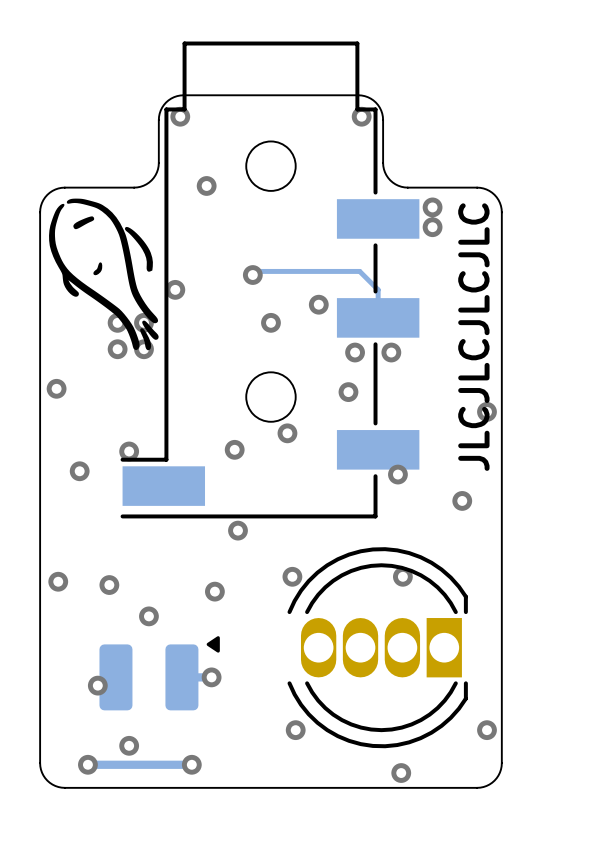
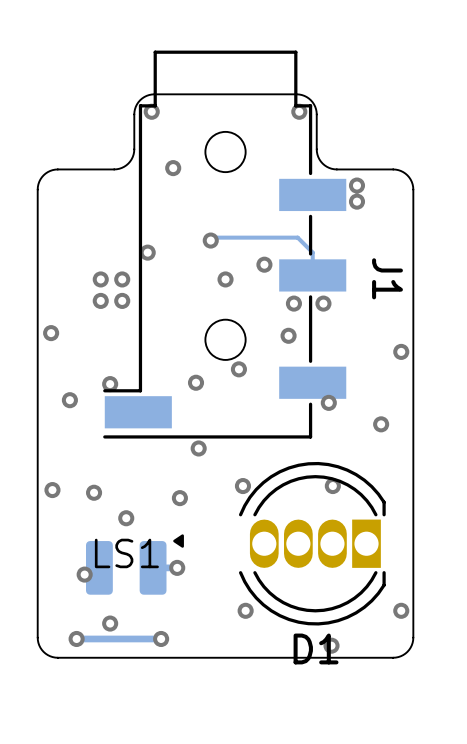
drawing: [49, 198, 159, 351] -> none
J1 name: none -> J1 (387, 278)
text: JLCJLCJLCJLC (473, 337) -> none
LS1 name: none -> LS1 (126, 553)
D1 name: none -> D1 (316, 648)

